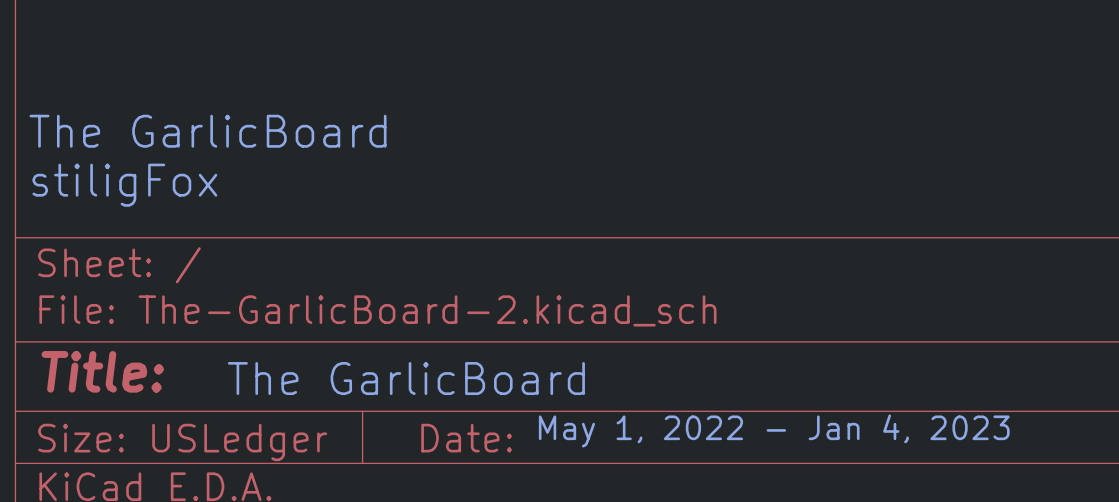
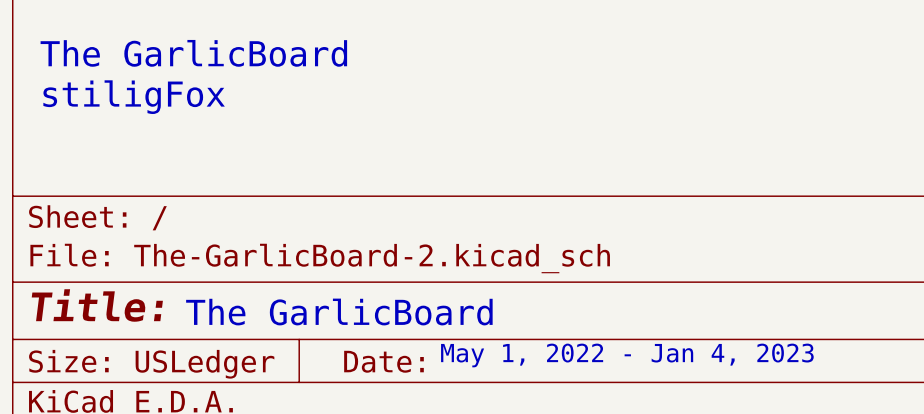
text position: The GarlicBoard (208, 131) -> The GarlicBoard (193, 53)
text position: stiligFox (124, 185) -> stiligFox (134, 97)

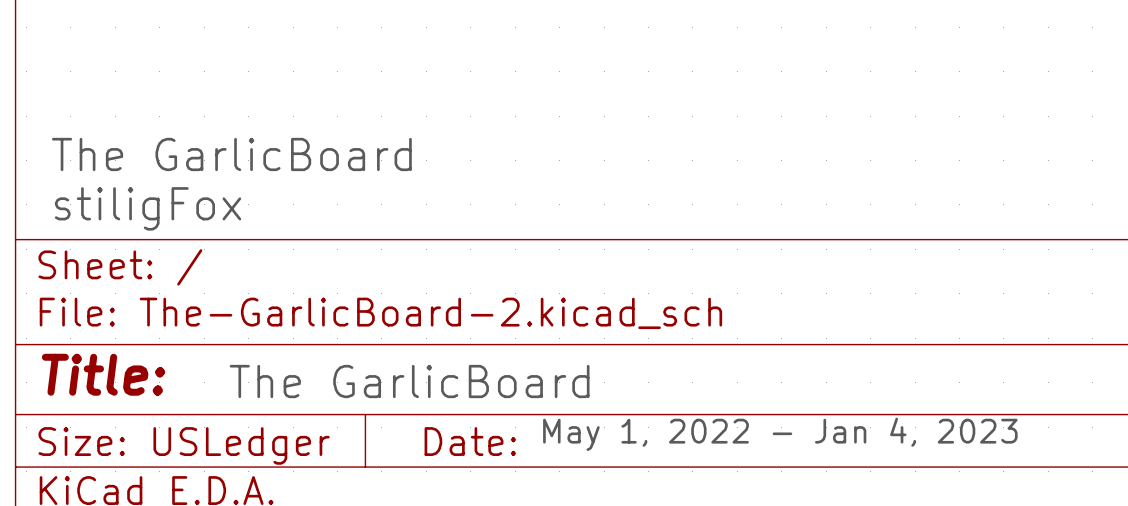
text position: The GarlicBoard (193, 53) -> The GarlicBoard (231, 154)
text position: stiligFox (134, 97) -> stiligFox (148, 208)

